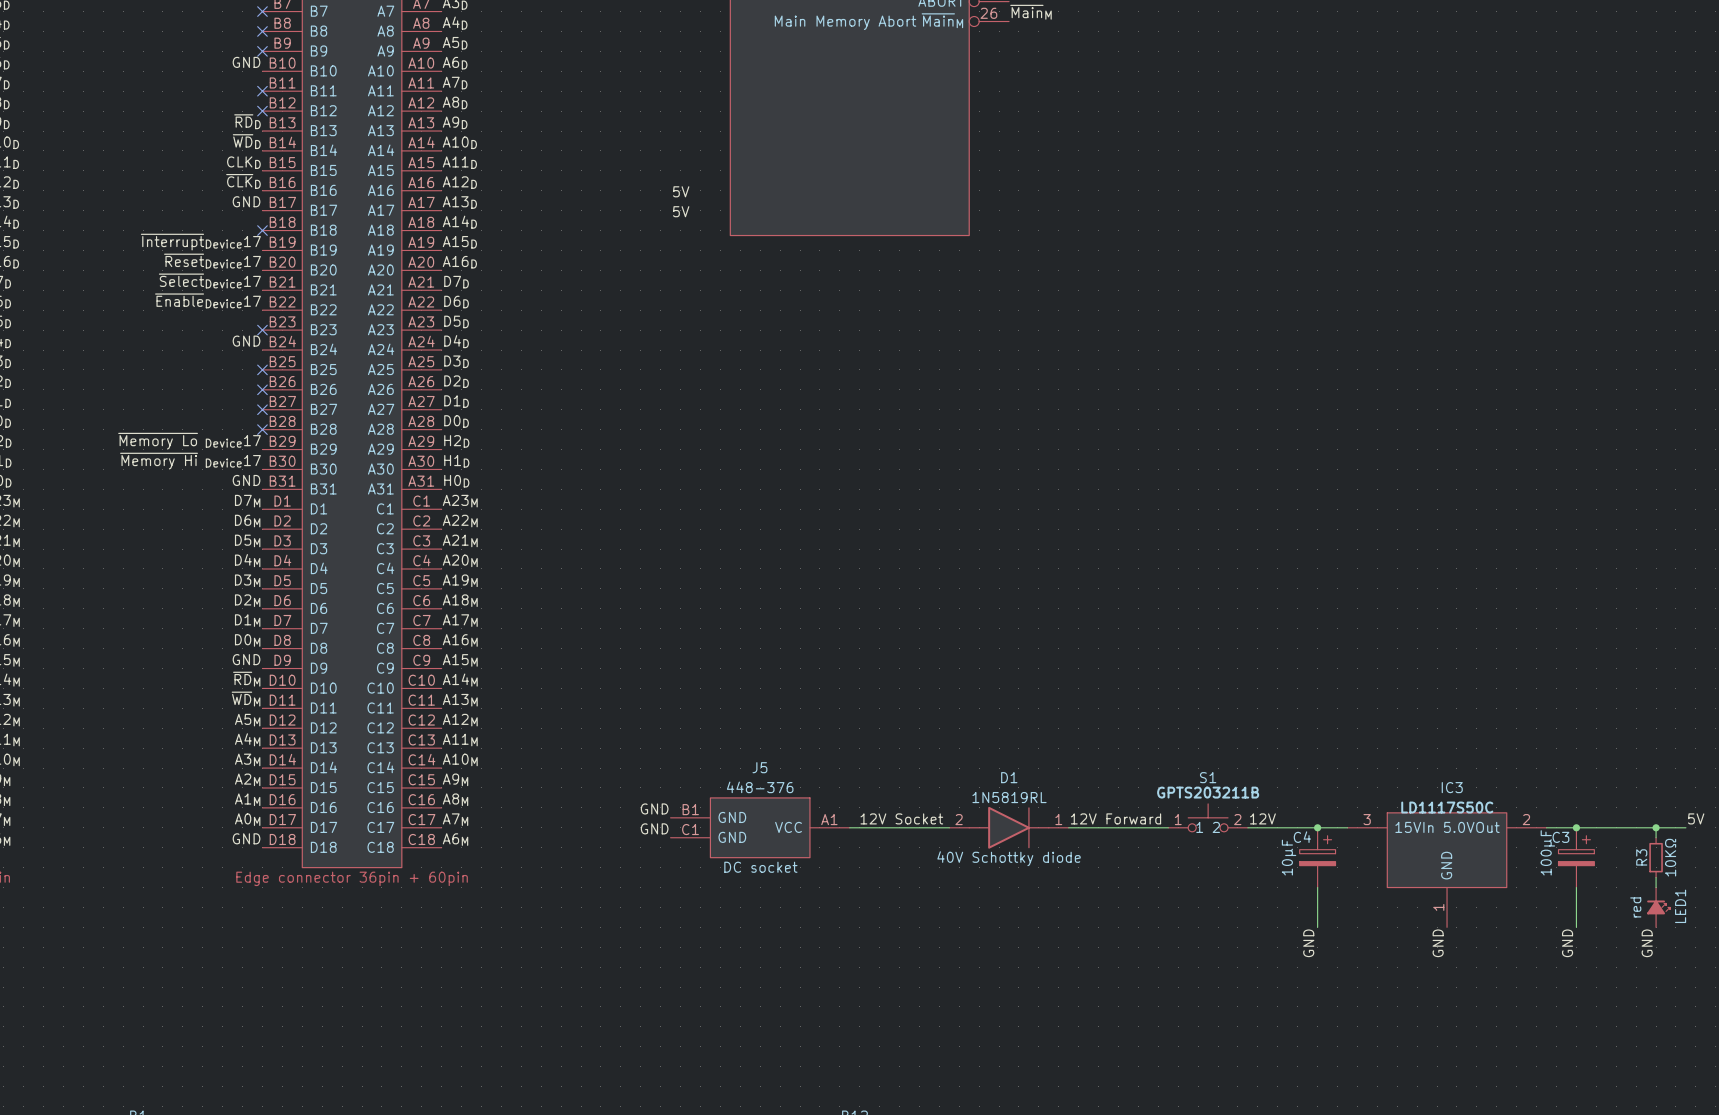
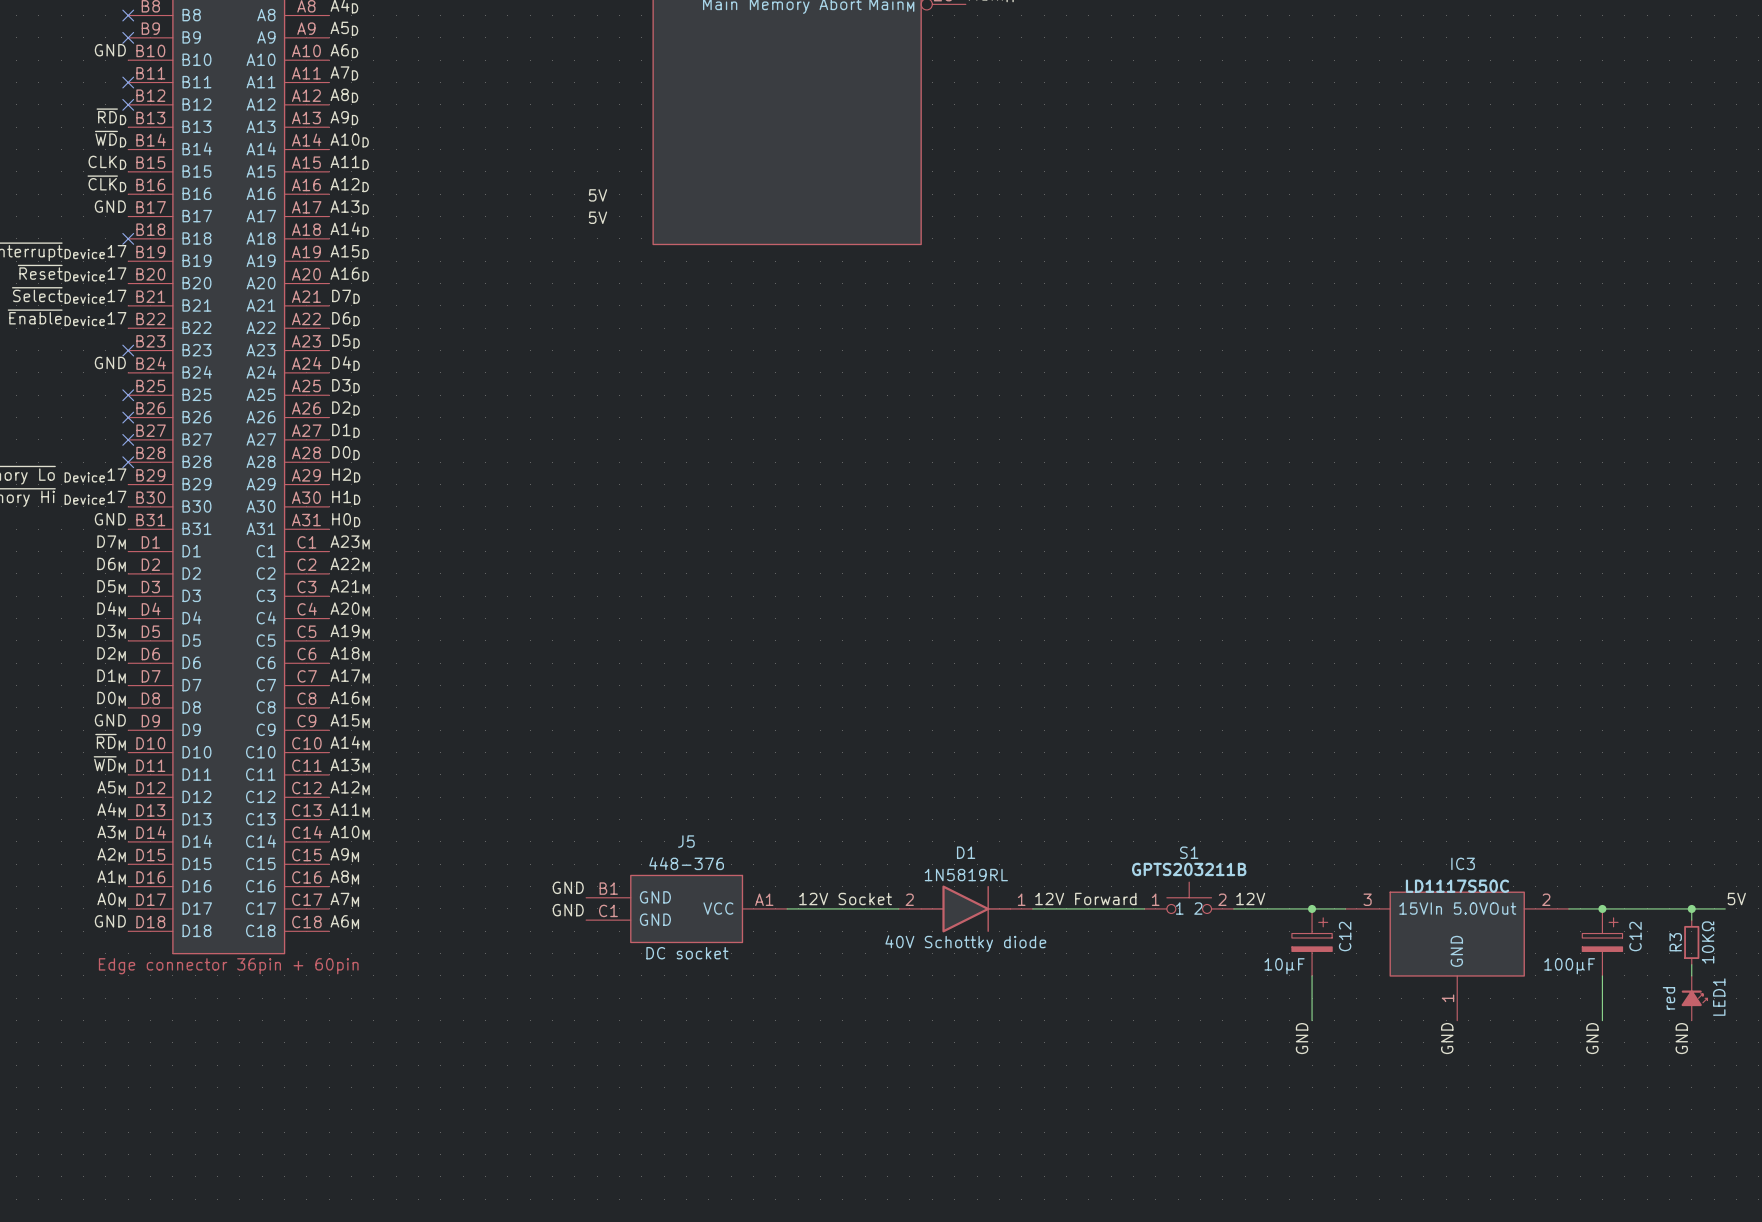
C4 name: C4 (1302, 837) -> C12 (1345, 936)
C3 name: C3 (1560, 837) -> C12 (1635, 936)
C3 value: 100μF (1547, 852) -> none
C4 value: 10μF (1289, 857) -> none
C4 text: none -> 10μF (1284, 966)
C3 text: none -> 100μF (1569, 966)

